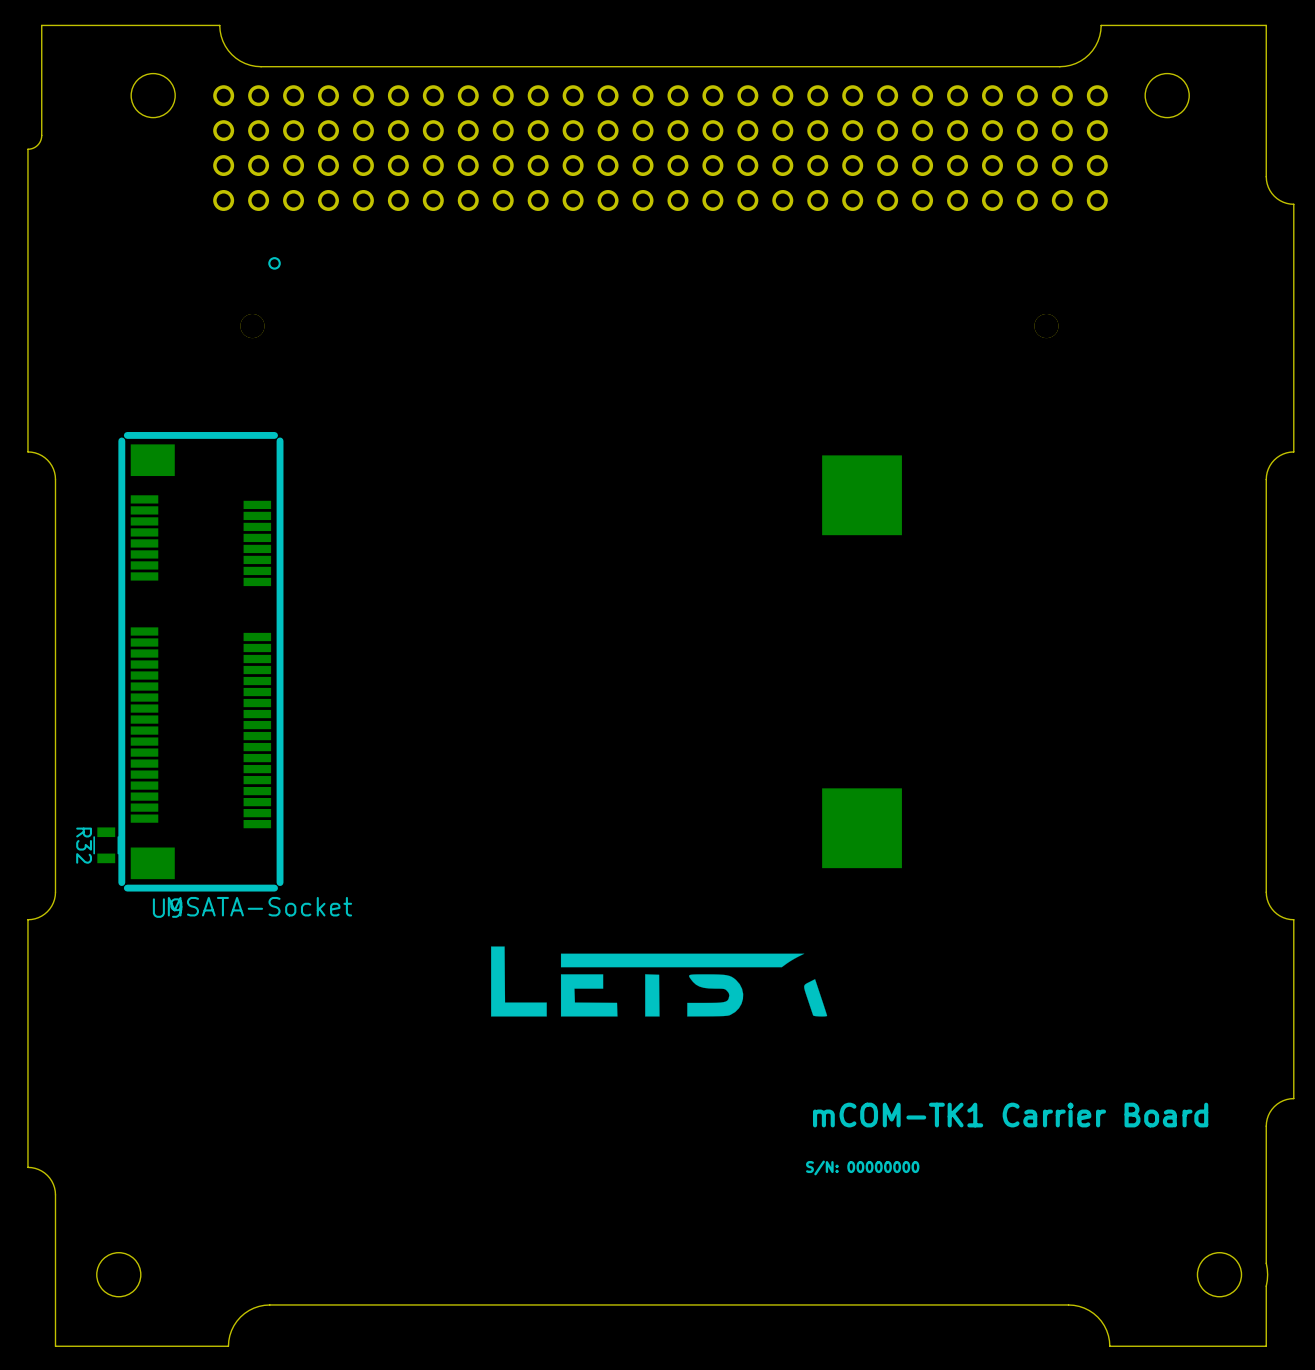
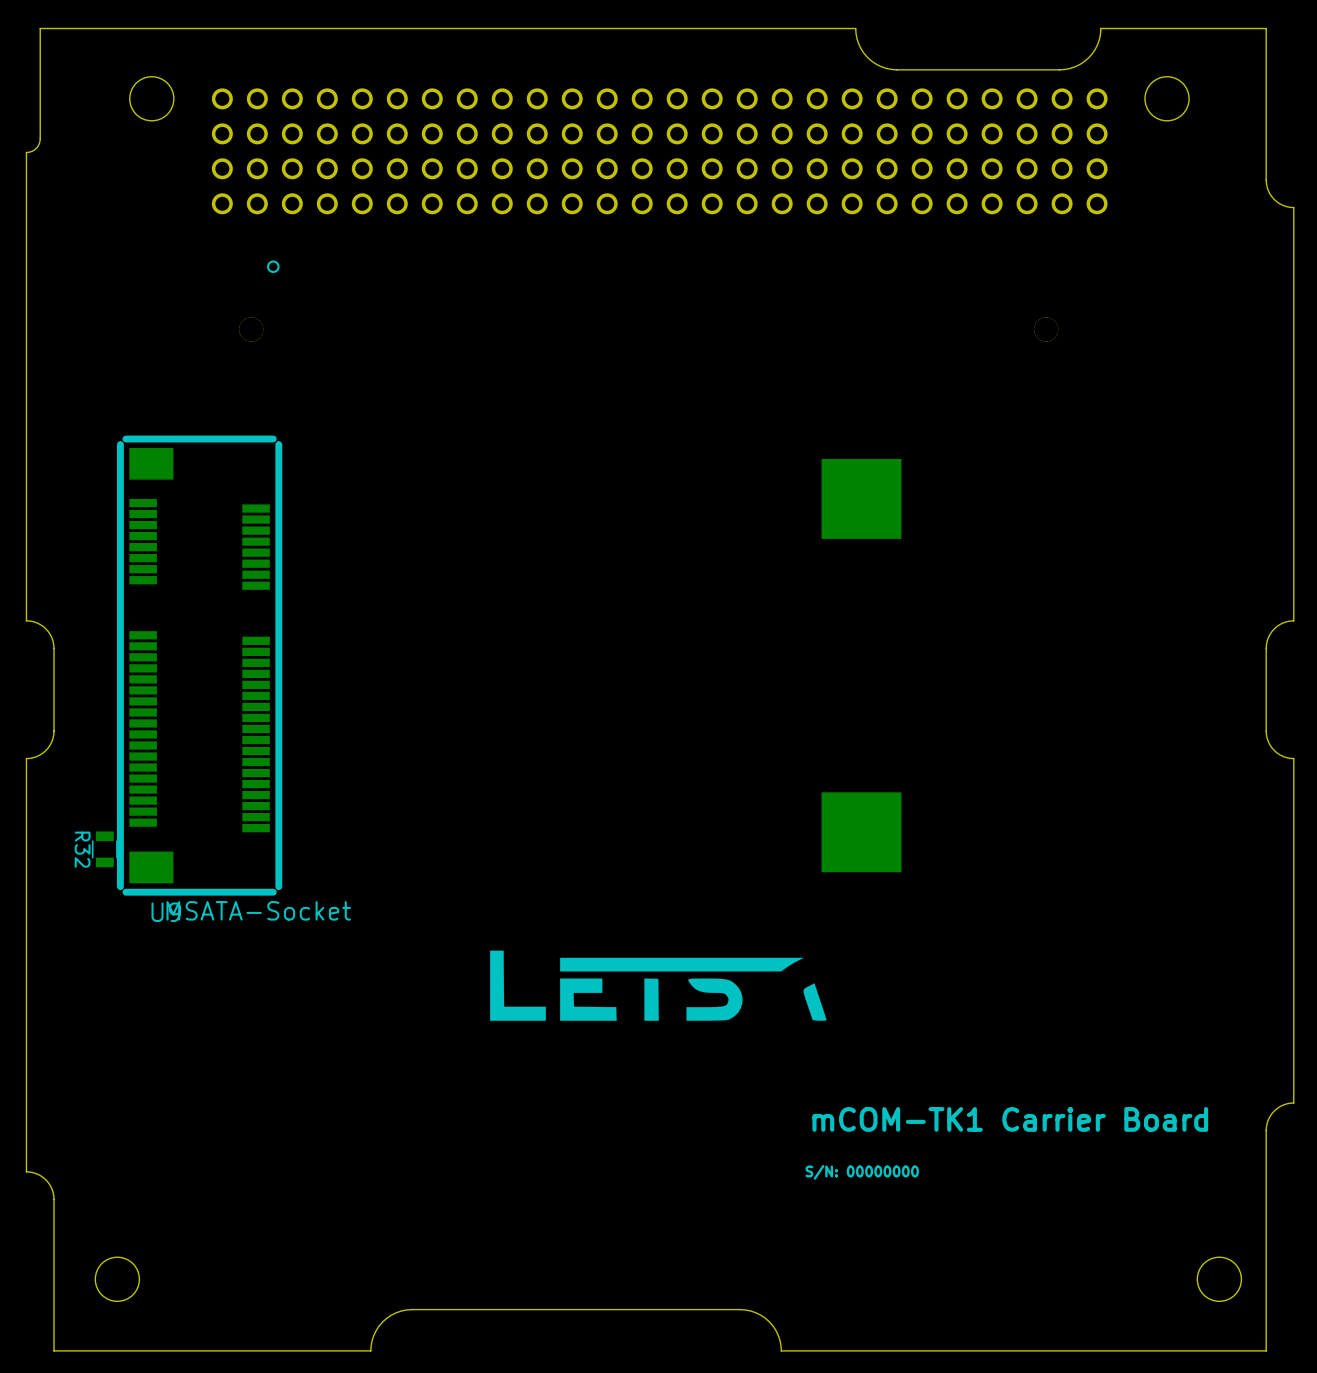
drawing shape: [27, 24, 1295, 1347] -> [25, 27, 1295, 1352]

